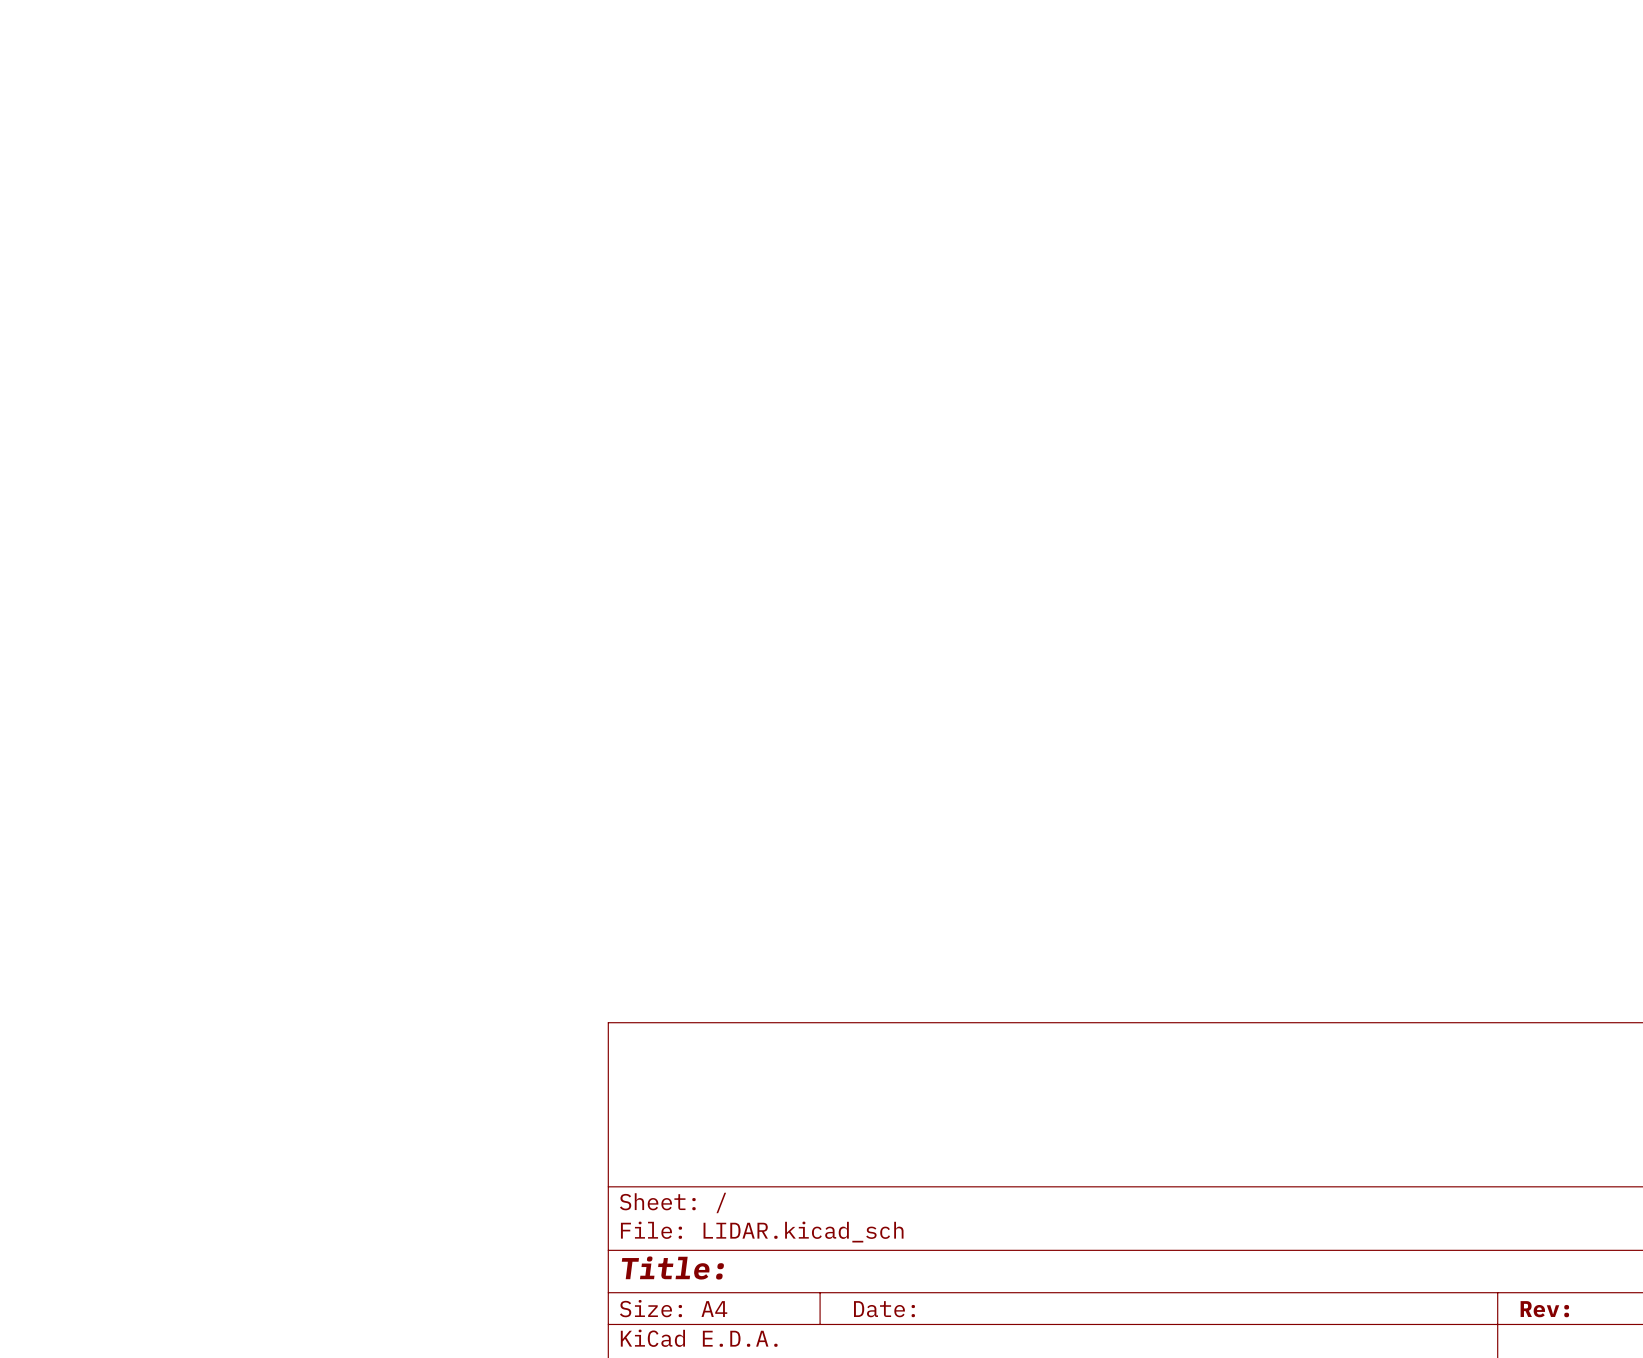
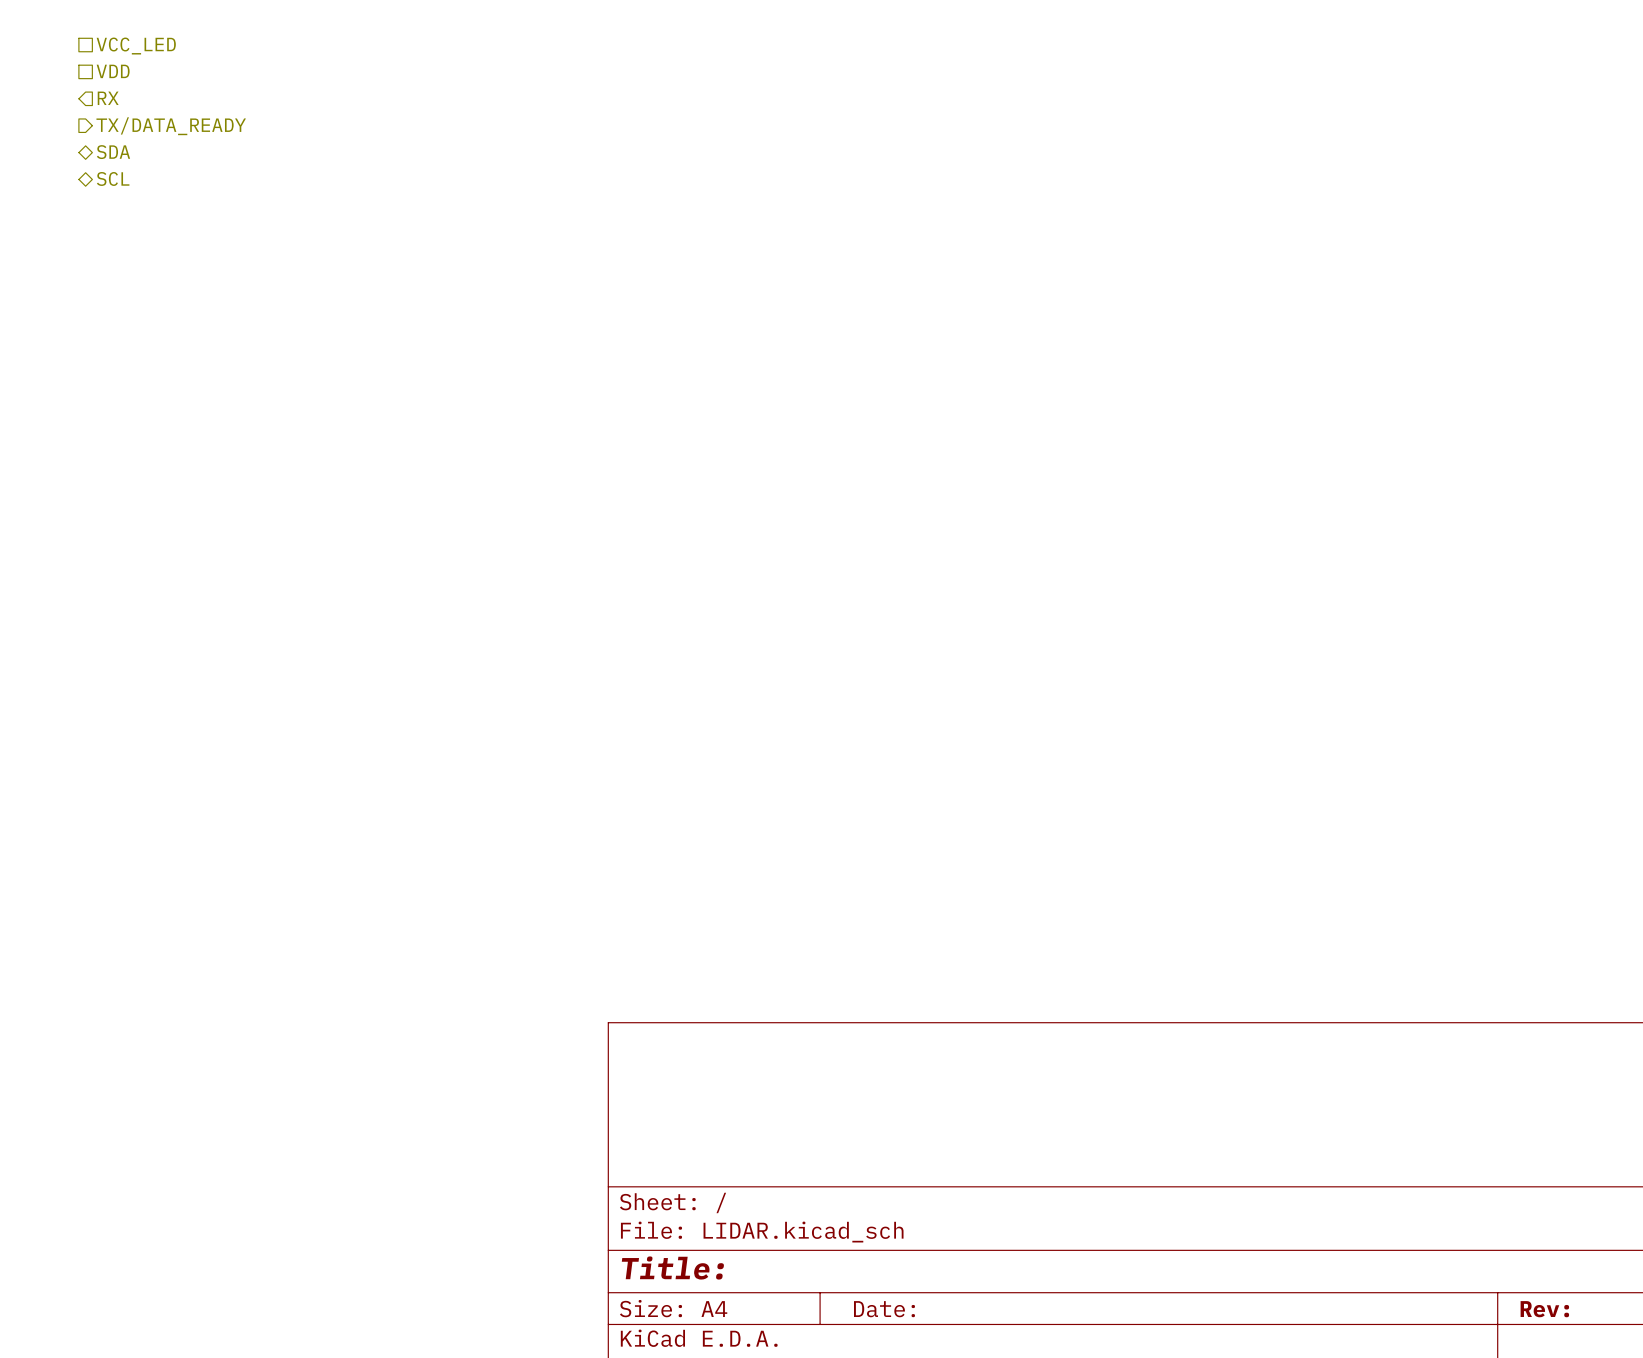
hierarchical label: none -> VCC_LED (136, 46)
hierarchical label: none -> VDD (113, 71)
hierarchical label: none -> RX (108, 98)
hierarchical label: none -> TX/DATA_READY (171, 126)
hierarchical label: none -> SDA (113, 152)
hierarchical label: none -> SCL (113, 178)

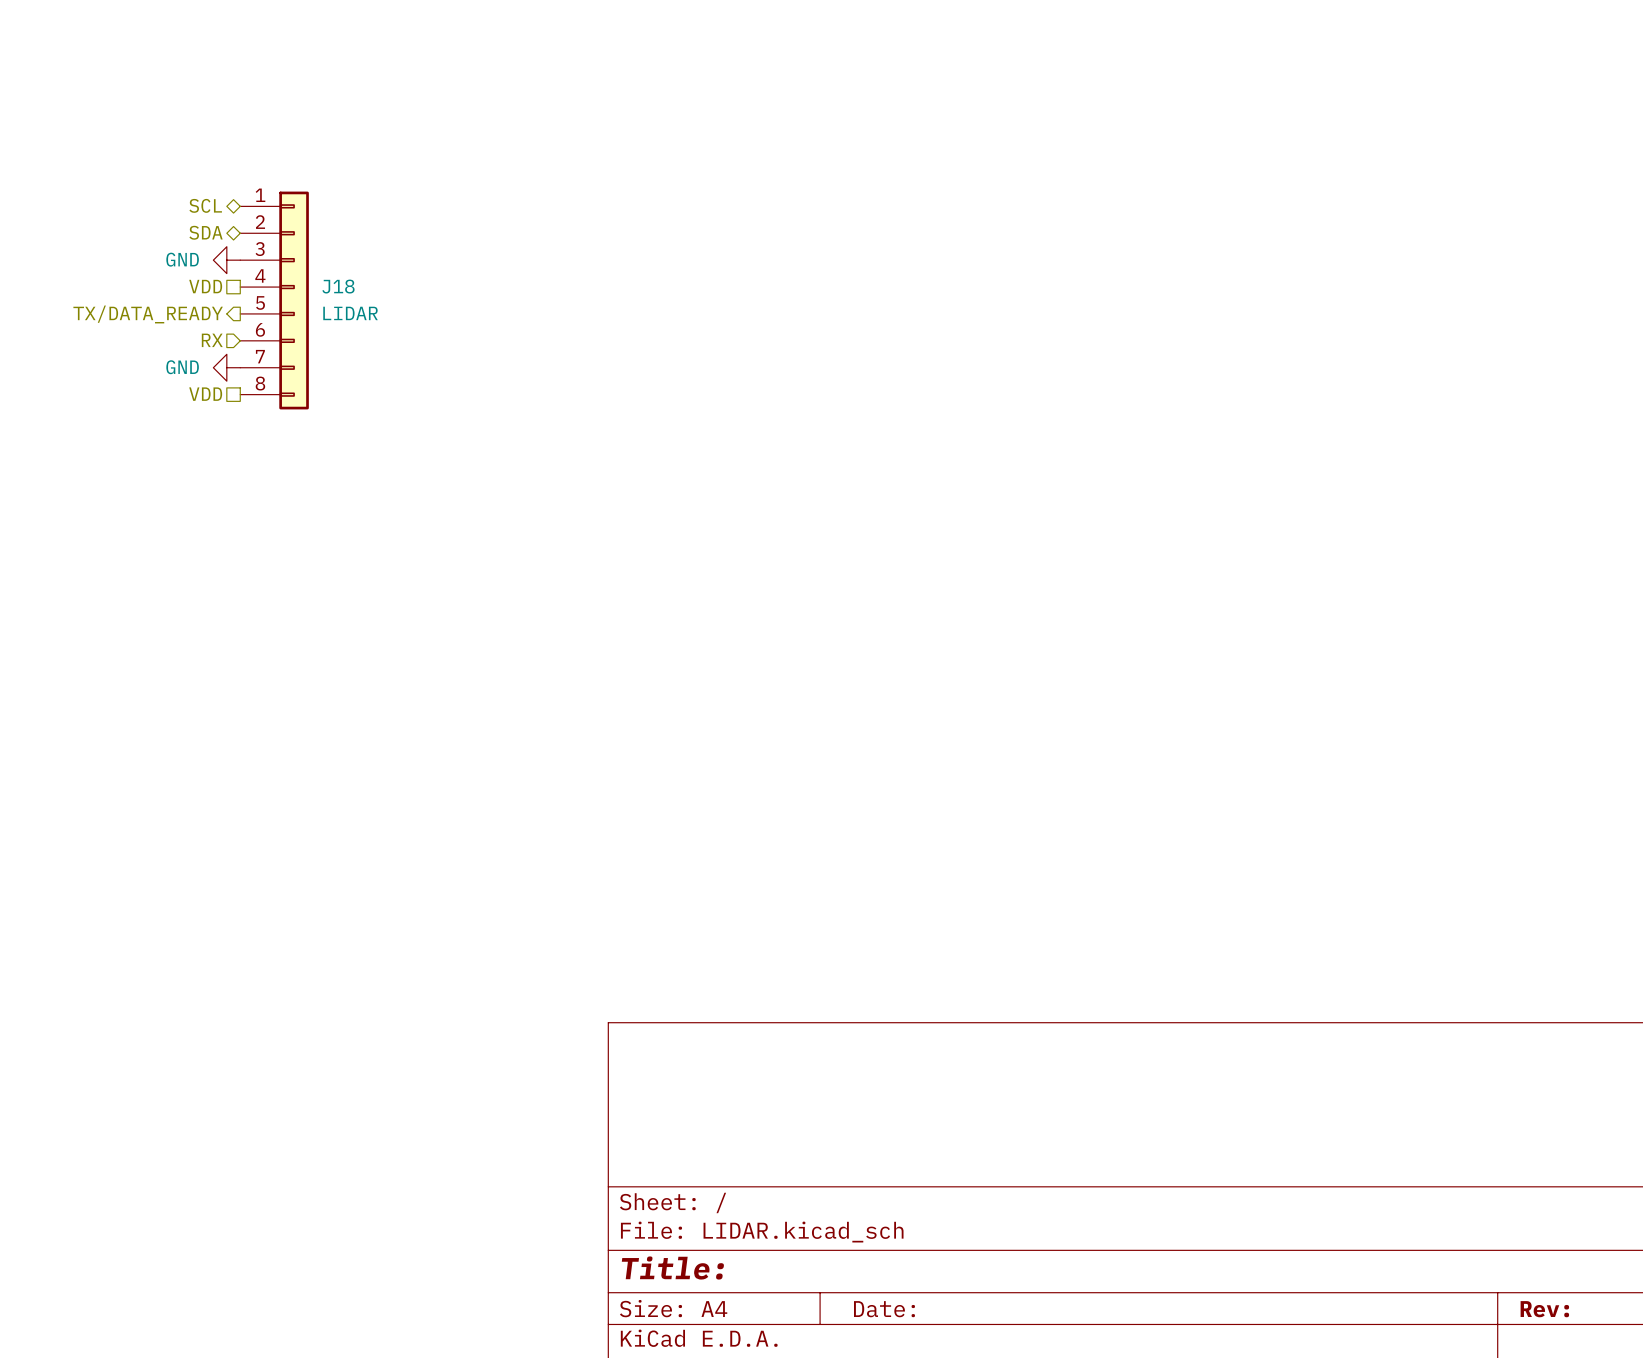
hierarchical label: VCC_LED (136, 46) -> none
hierarchical label: VDD (113, 71) -> none
hierarchical label: RX (108, 98) -> none
hierarchical label rotation: 0° (171, 126) -> 180° (148, 314)
hierarchical label position: TX/DATA_READY (171, 126) -> TX/DATA_READY (148, 314)
hierarchical label rotation: 0° (113, 152) -> 180° (206, 232)
hierarchical label position: SDA (113, 152) -> SDA (206, 232)
hierarchical label rotation: 0° (113, 178) -> 180° (205, 205)
hierarchical label position: SCL (113, 178) -> SCL (205, 205)
power symbol: none -> GND (226, 260)
hierarchical label: none -> VDD (205, 286)
J18: none -> LIDAR (274, 300)
hierarchical label: none -> RX (212, 340)
power symbol: none -> GND (226, 367)
hierarchical label: none -> VDD (205, 394)

